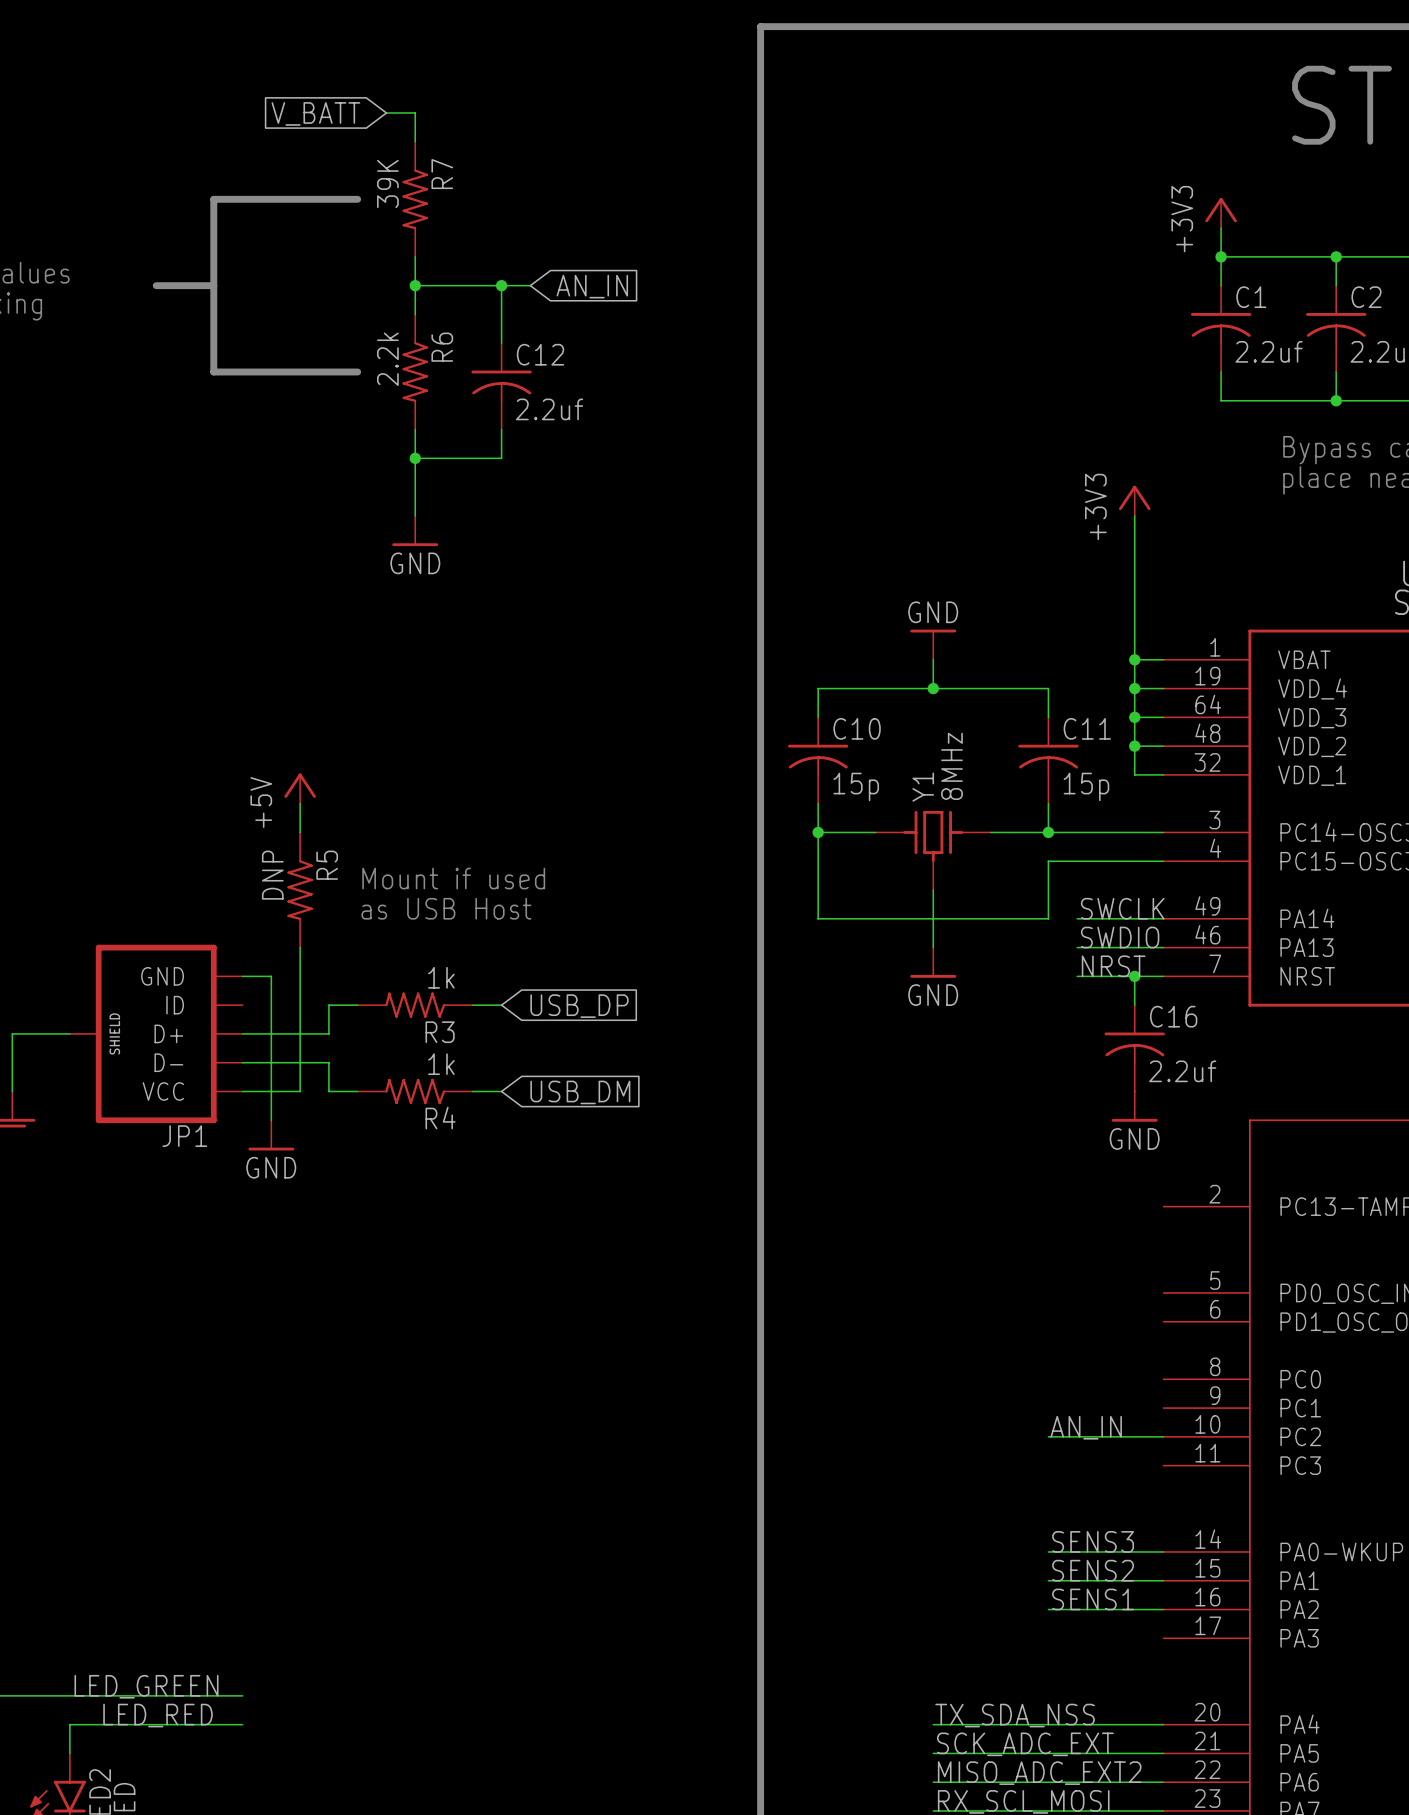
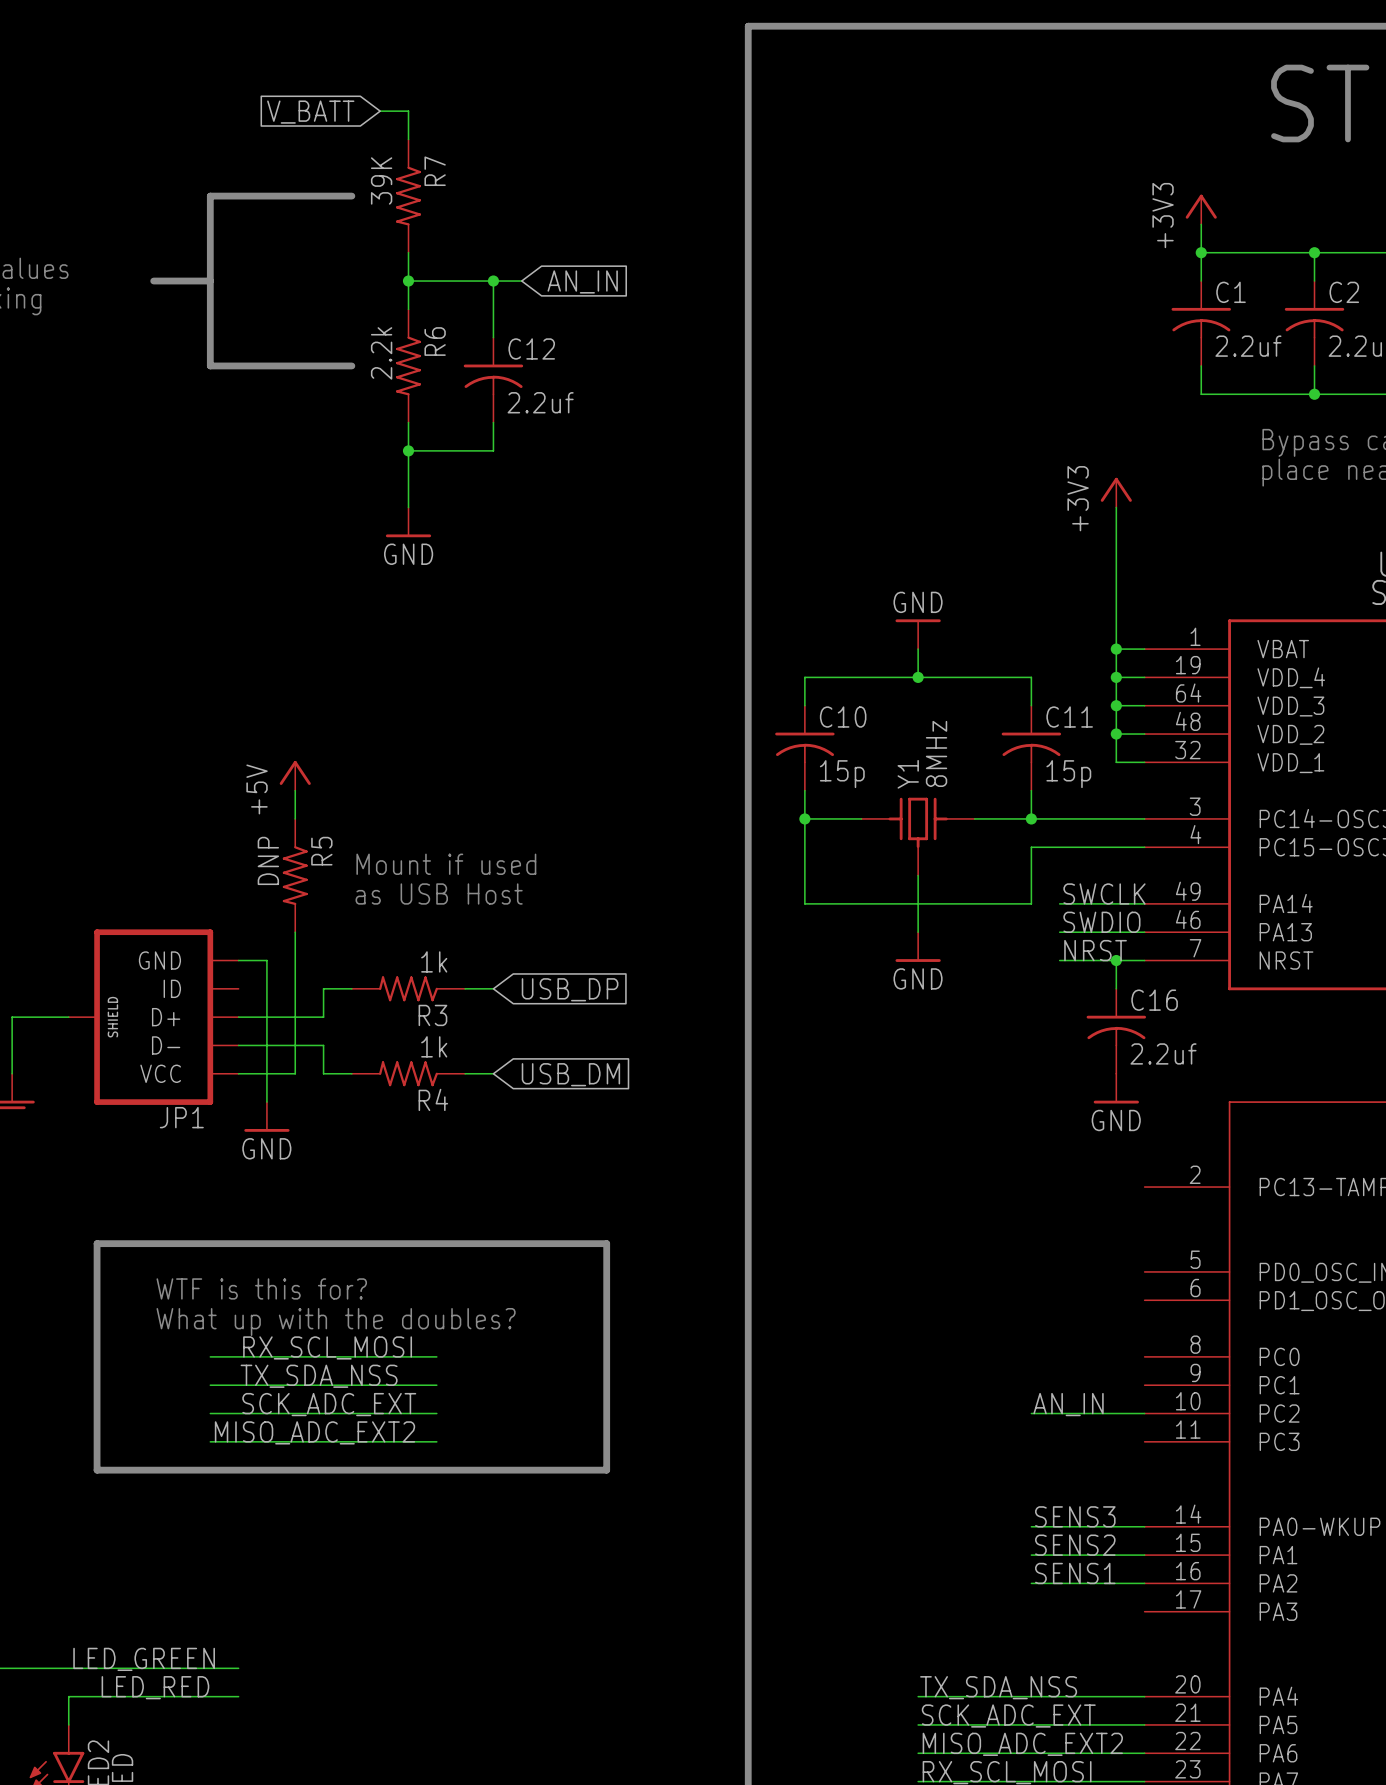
line: none -> (97, 1243) (606, 1243) (606, 1470) (97, 1470) (97, 1243)
text: none -> WTF is this for? (261, 1288)
text: none -> What up with the doubles? (336, 1321)
label: none -> RX_SCL_MOSI (327, 1347)
wire: none -> (210, 1356) (436, 1356)
label: none -> TX_SDA_NSS (319, 1376)
wire: none -> (210, 1385) (436, 1385)
label: none -> SCK_ADC_EXT (329, 1404)
wire: none -> (210, 1413) (436, 1413)
label: none -> MISO_ADC_EXT2 (314, 1432)
wire: none -> (210, 1441) (436, 1441)

